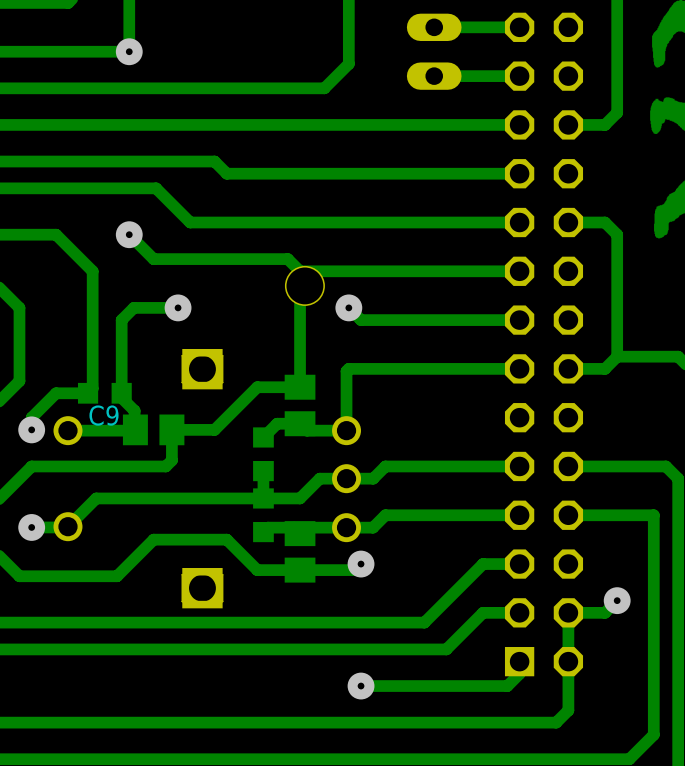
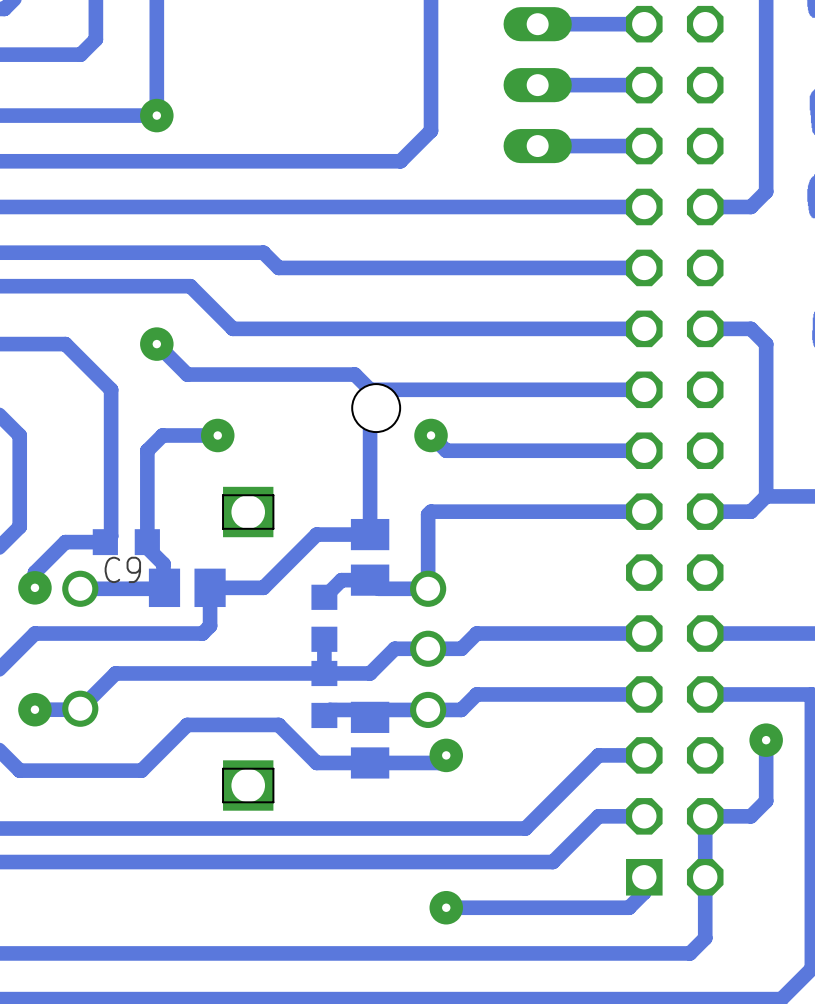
track: none -> (766, 740) (766, 801)
via position: (617, 600) -> (766, 740)

